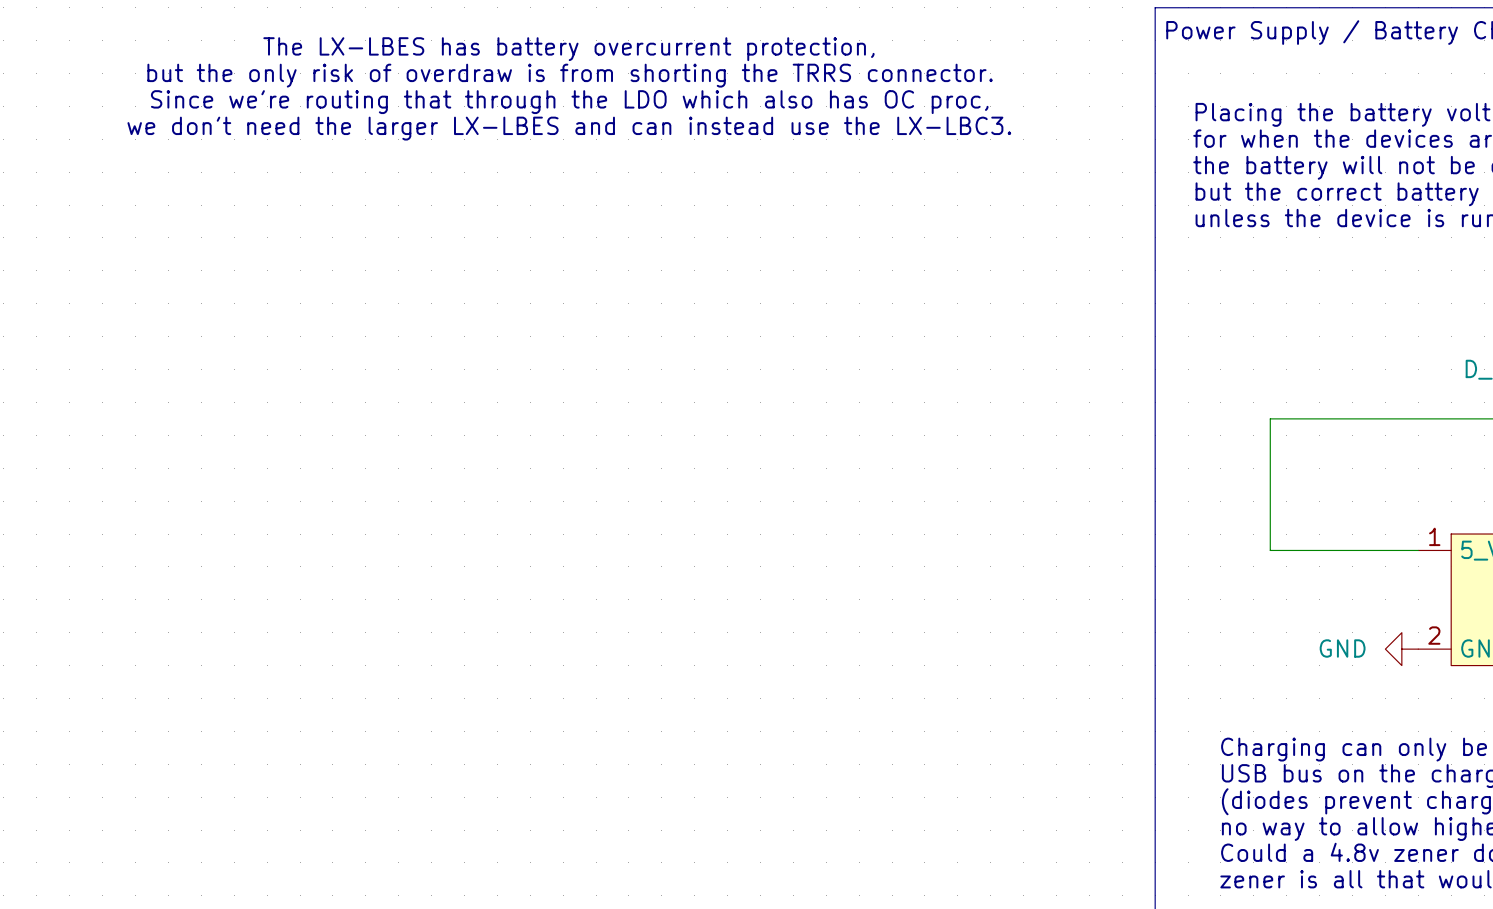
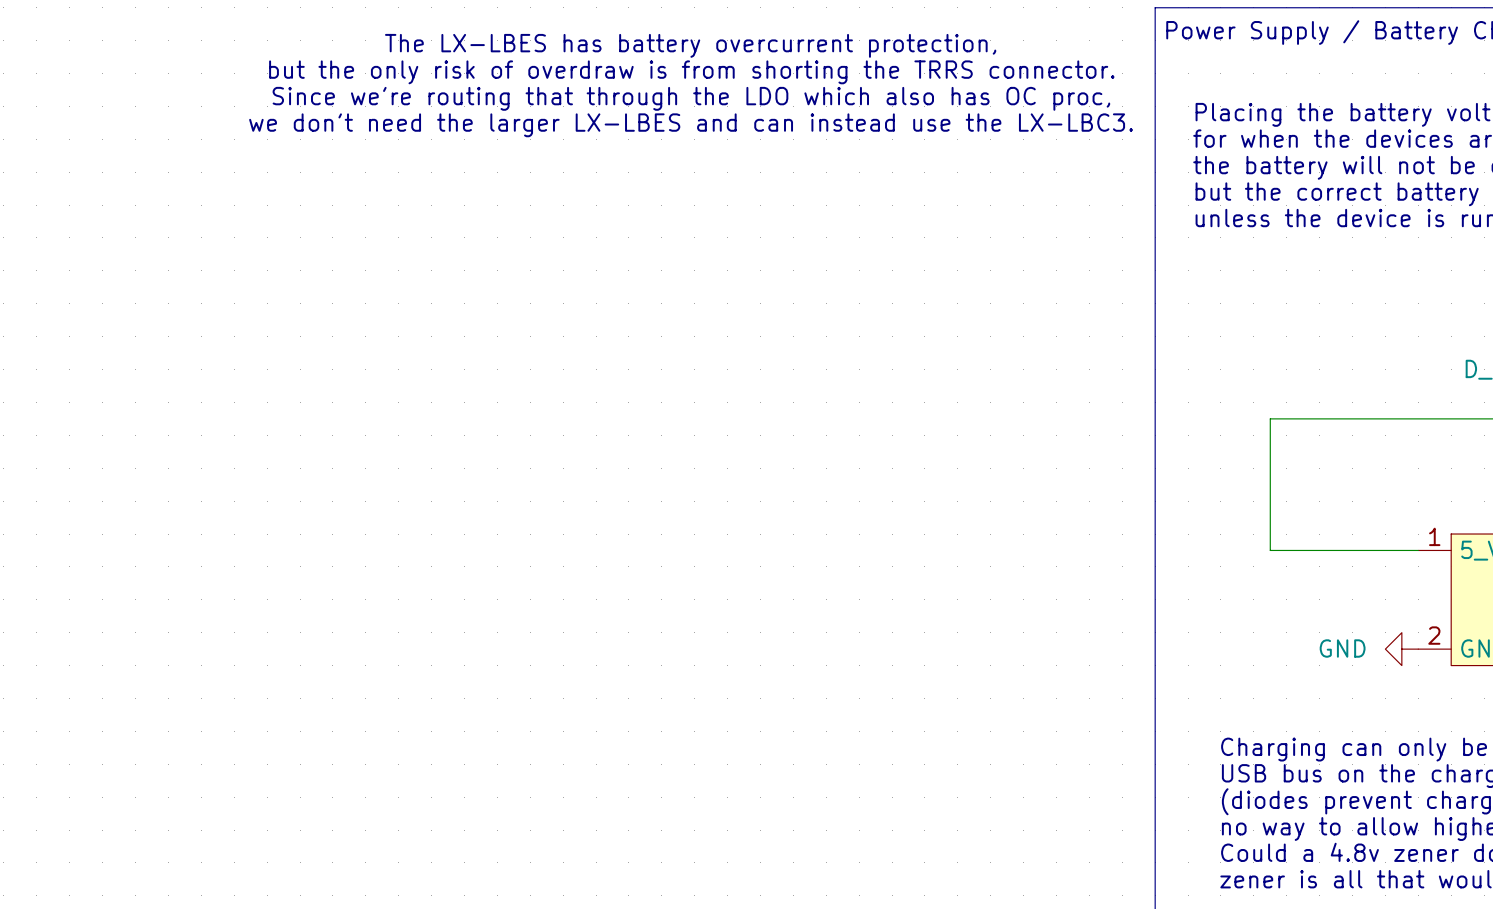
text position: The LX-LBES has battery overcurrent protection, (568, 49) -> The LX-LBES has battery overcurrent protection, (690, 45)
text position: but the only risk of overdraw is from shorting the TRRS connector. (570, 75) -> but the only risk of overdraw is from shorting the TRRS connector. (691, 72)
text position: Since we're routing that through the LDO which also has OC proc, (569, 102) -> Since we're routing that through the LDO which also has OC proc, (691, 98)
text position: we don't need the larger LX-LBES and can instead use the LX-LBC3. (569, 128) -> we don't need the larger LX-LBES and can instead use the LX-LBC3. (691, 125)

